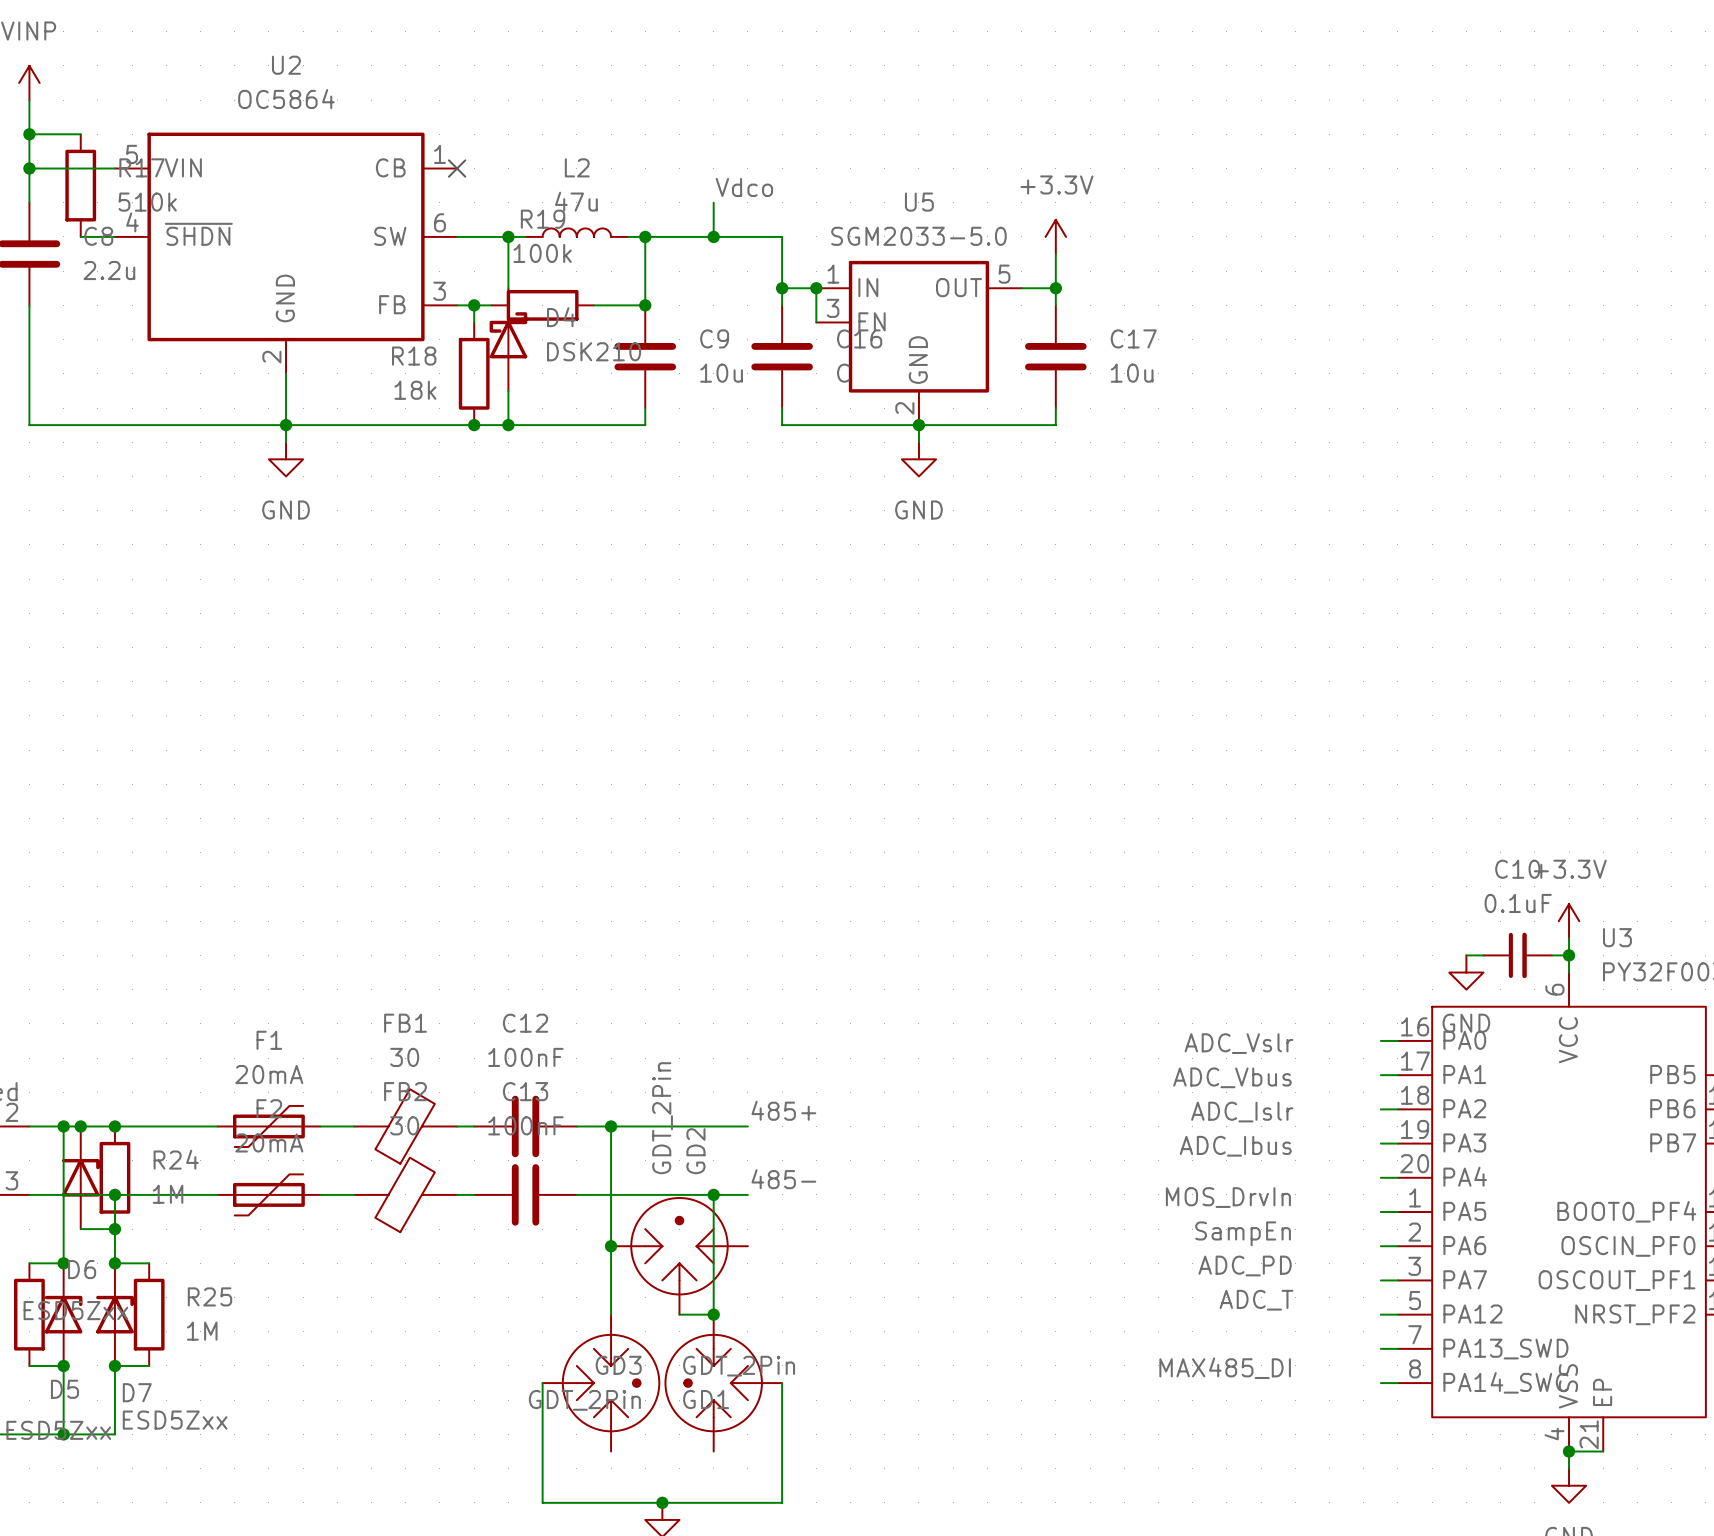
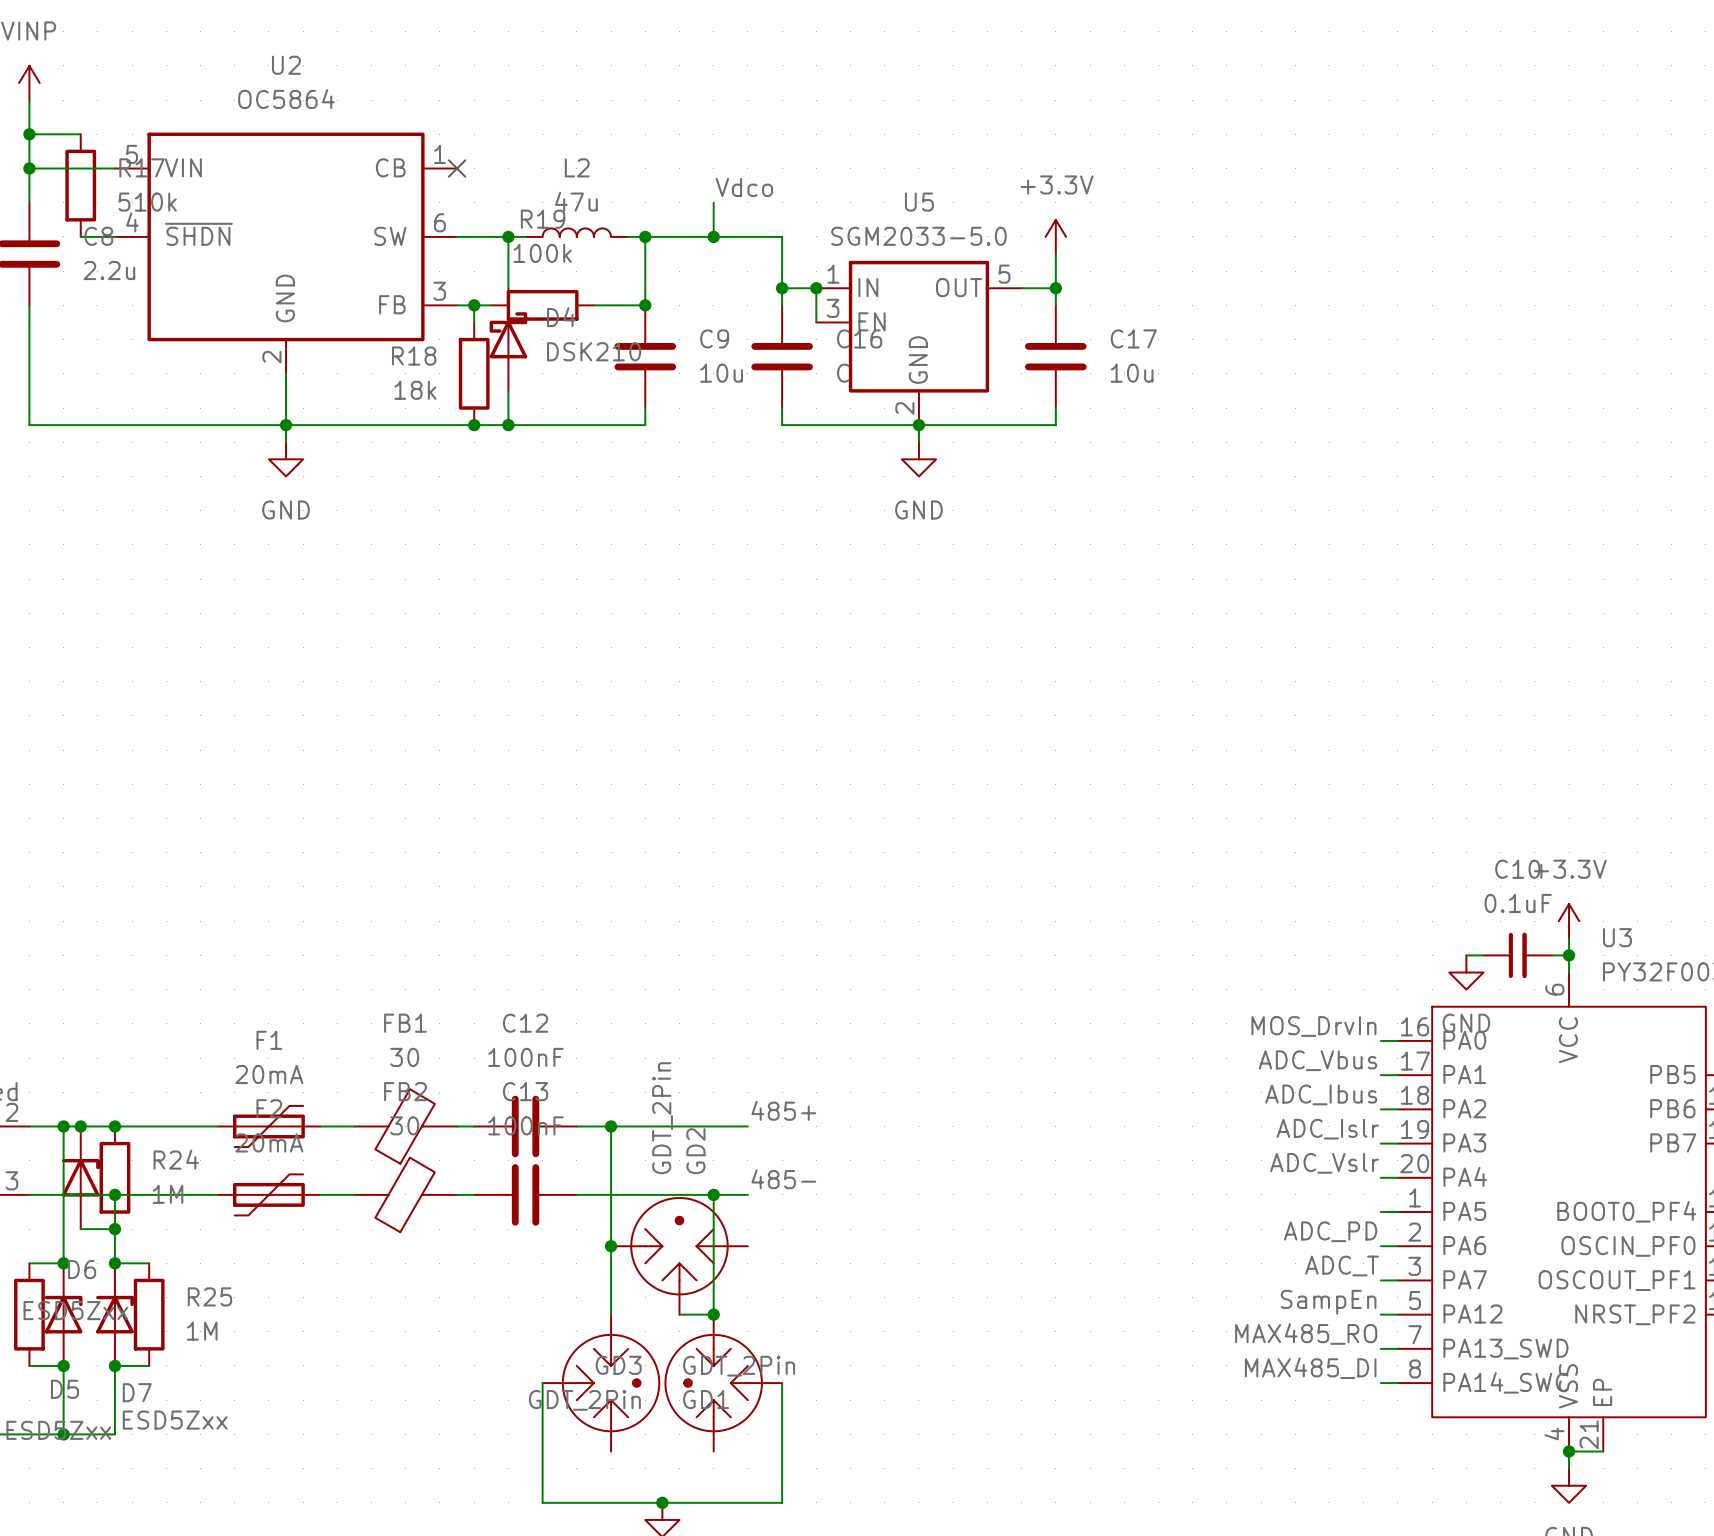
label position: ADC_Vslr (1238, 1043) -> ADC_Vslr (1324, 1163)
label position: ADC_Vbus (1232, 1077) -> ADC_Vbus (1318, 1060)
label position: ADC_Islr (1242, 1112) -> ADC_Islr (1327, 1129)
label position: ADC_Ibus (1235, 1146) -> ADC_Ibus (1321, 1094)
label position: MOS_DrvIn (1228, 1197) -> MOS_DrvIn (1313, 1026)
label position: SampEn (1243, 1233) -> SampEn (1328, 1302)
label position: ADC_PD (1245, 1265) -> ADC_PD (1330, 1231)
label position: ADC_T (1256, 1300) -> ADC_T (1342, 1265)
label: none -> MAX485_RO (1306, 1334)
label position: MAX485_DI (1225, 1368) -> MAX485_DI (1310, 1368)

